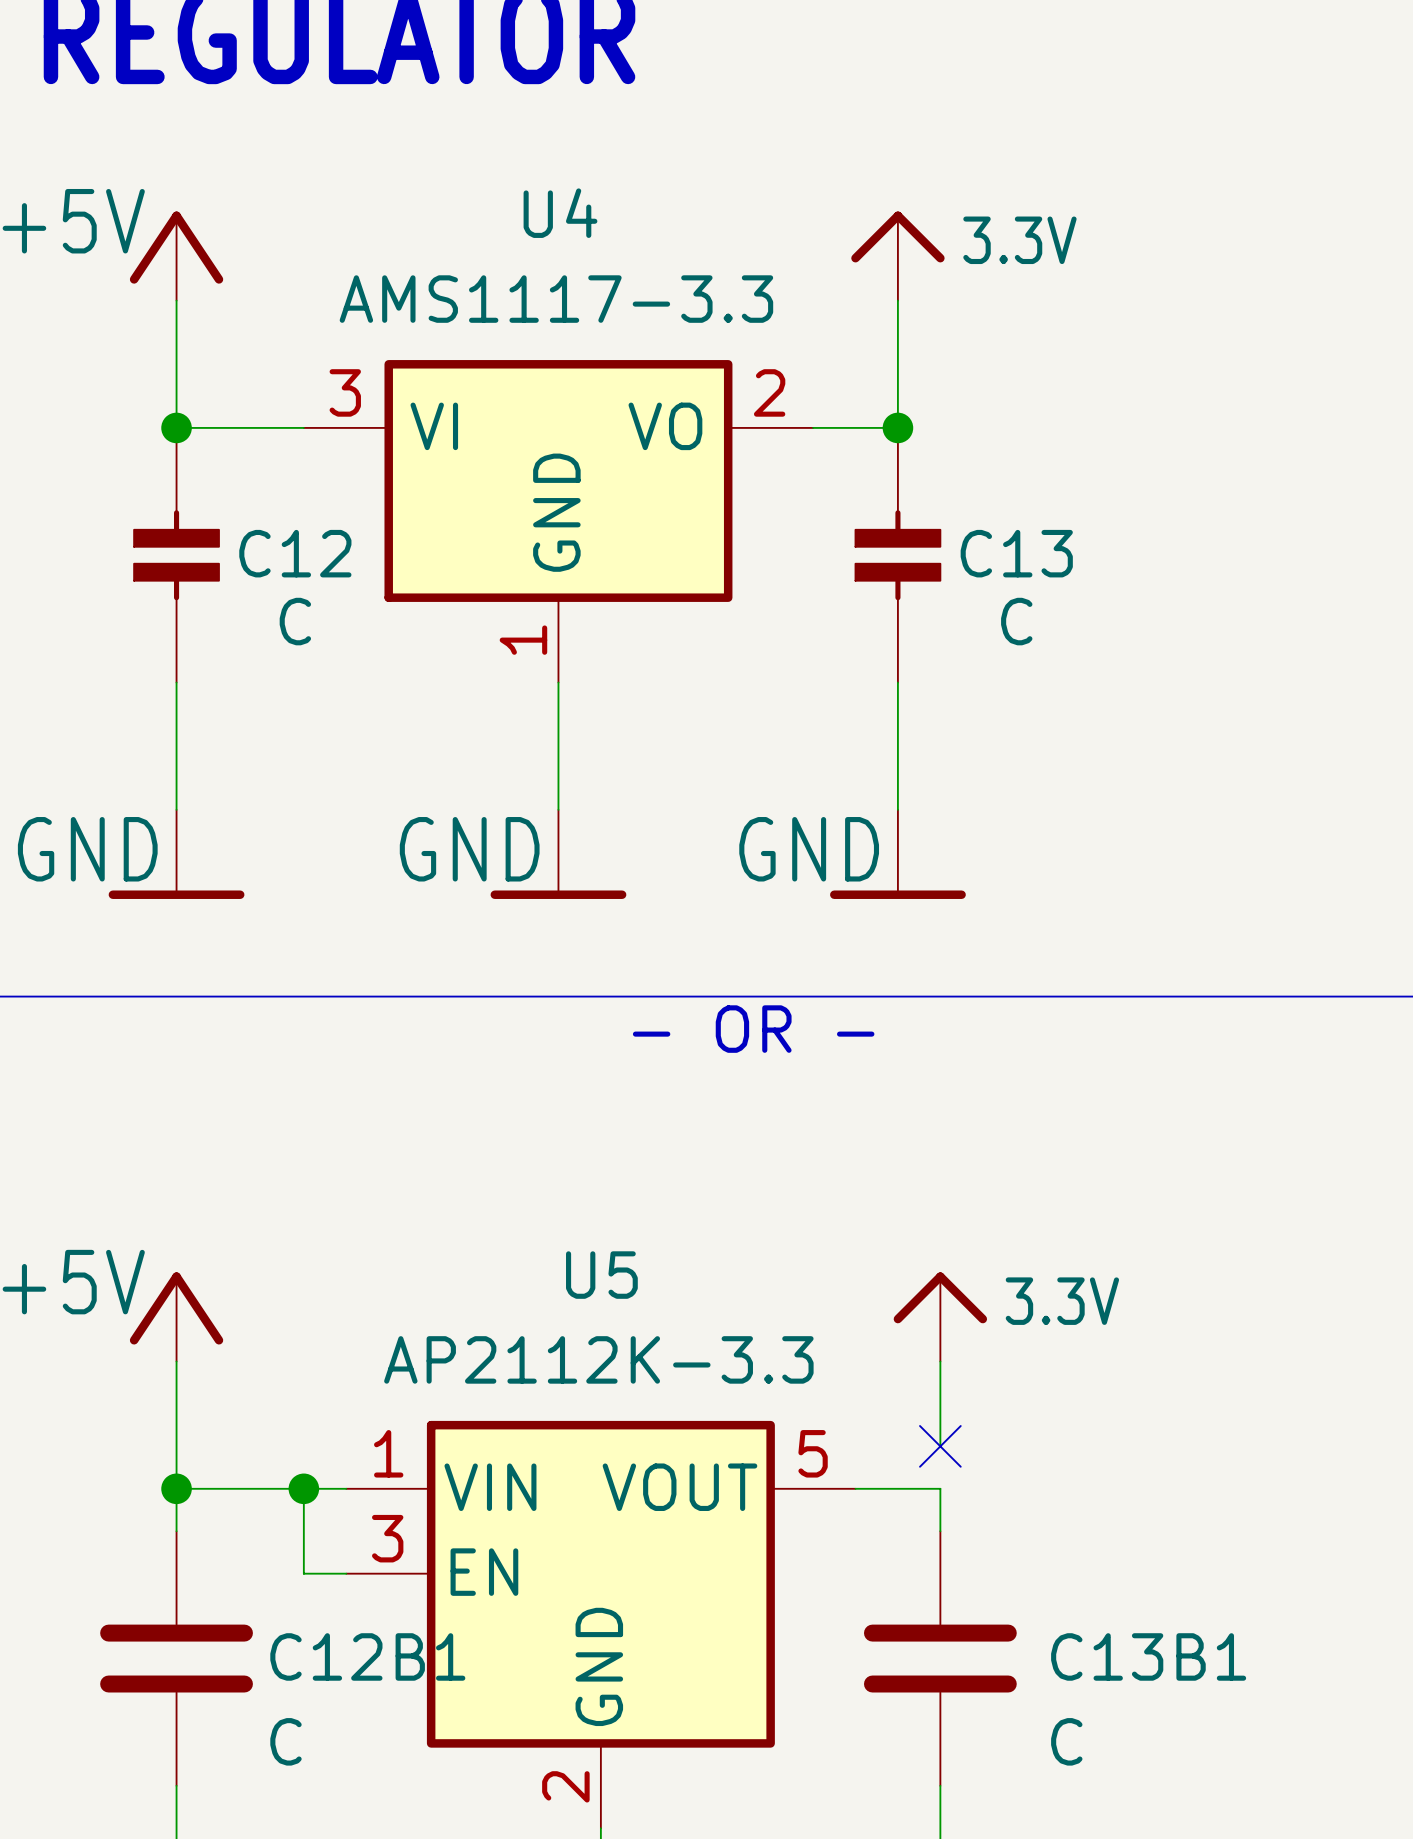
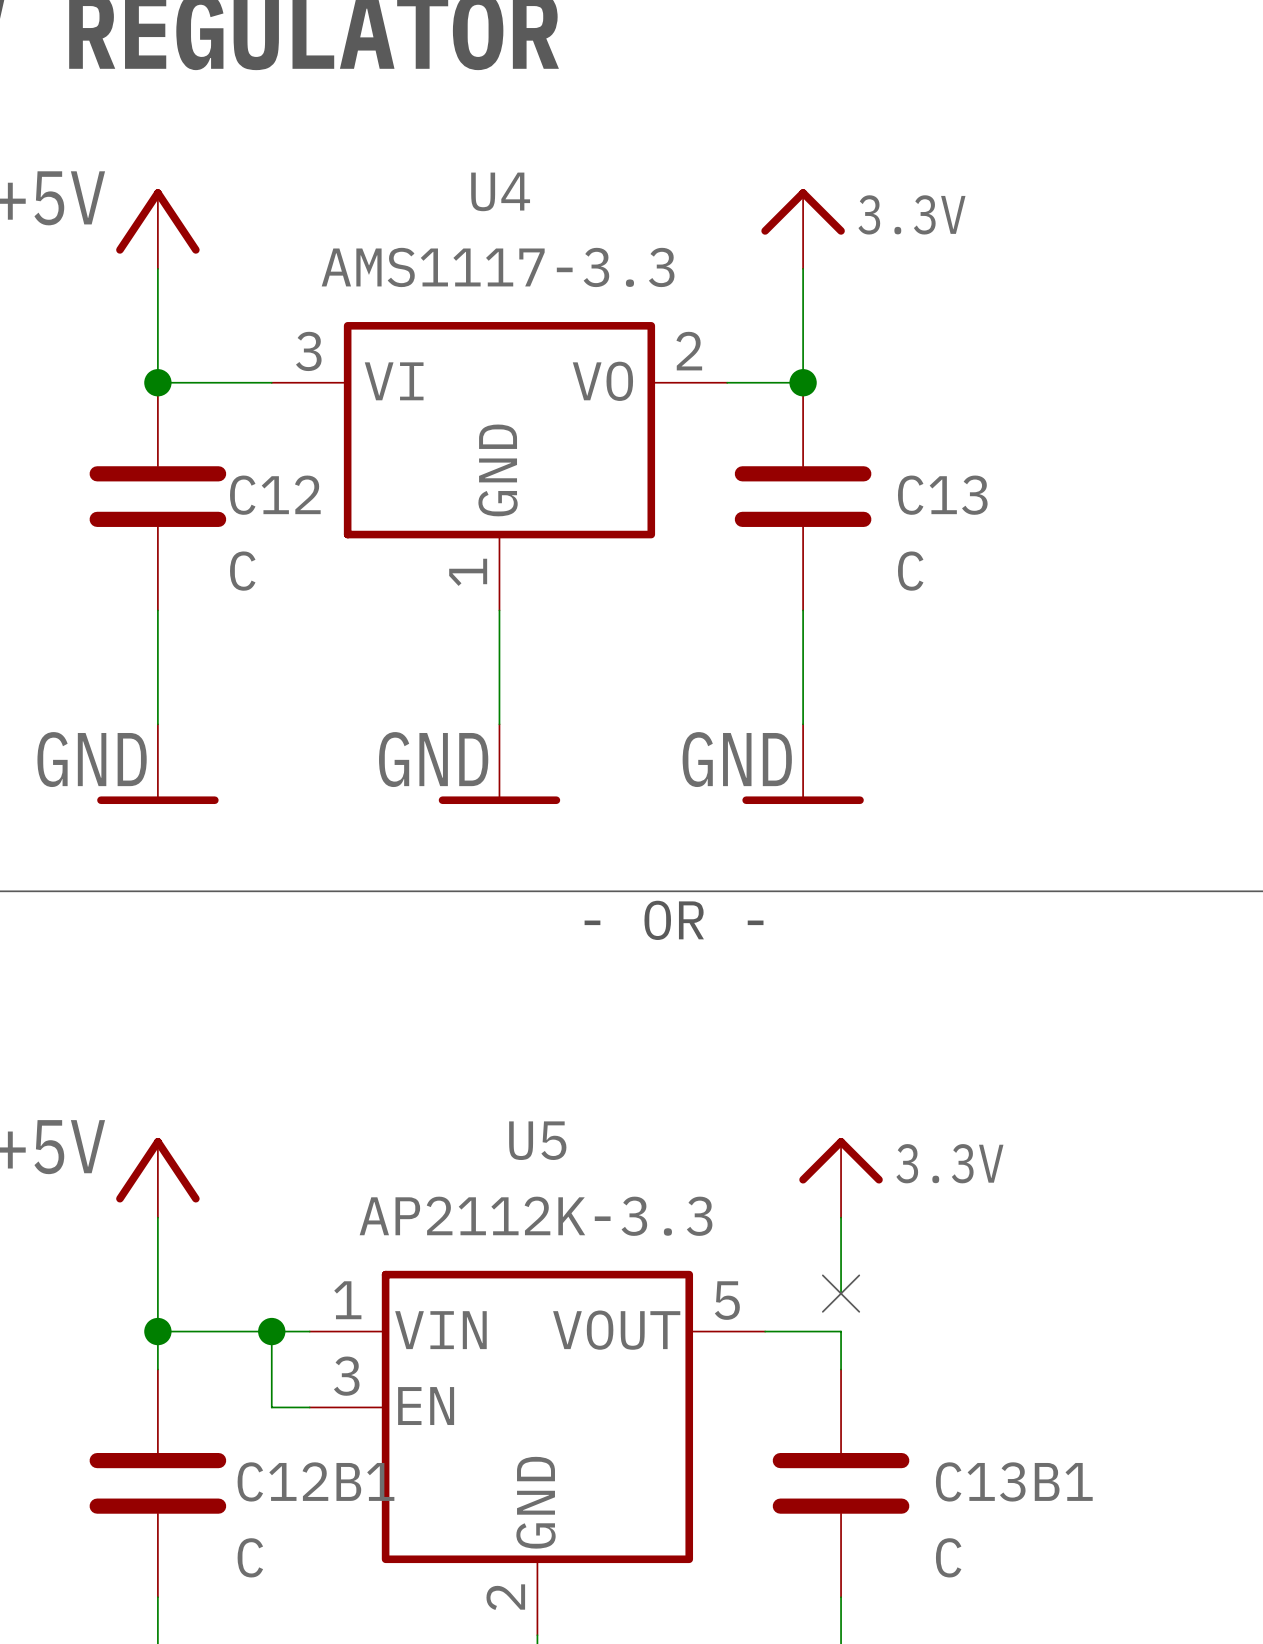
C12 symbol: [134, 427, 219, 683] -> [89, 382, 227, 611]
C13 symbol: [855, 427, 941, 683] -> [734, 382, 872, 611]
C12 name position: C12 (295, 553) -> C12 (275, 495)
C13 name position: C13 (1016, 553) -> C13 (942, 495)
C12 value position: C (295, 621) -> C (242, 571)
C13 value position: C (1016, 621) -> C (910, 571)

